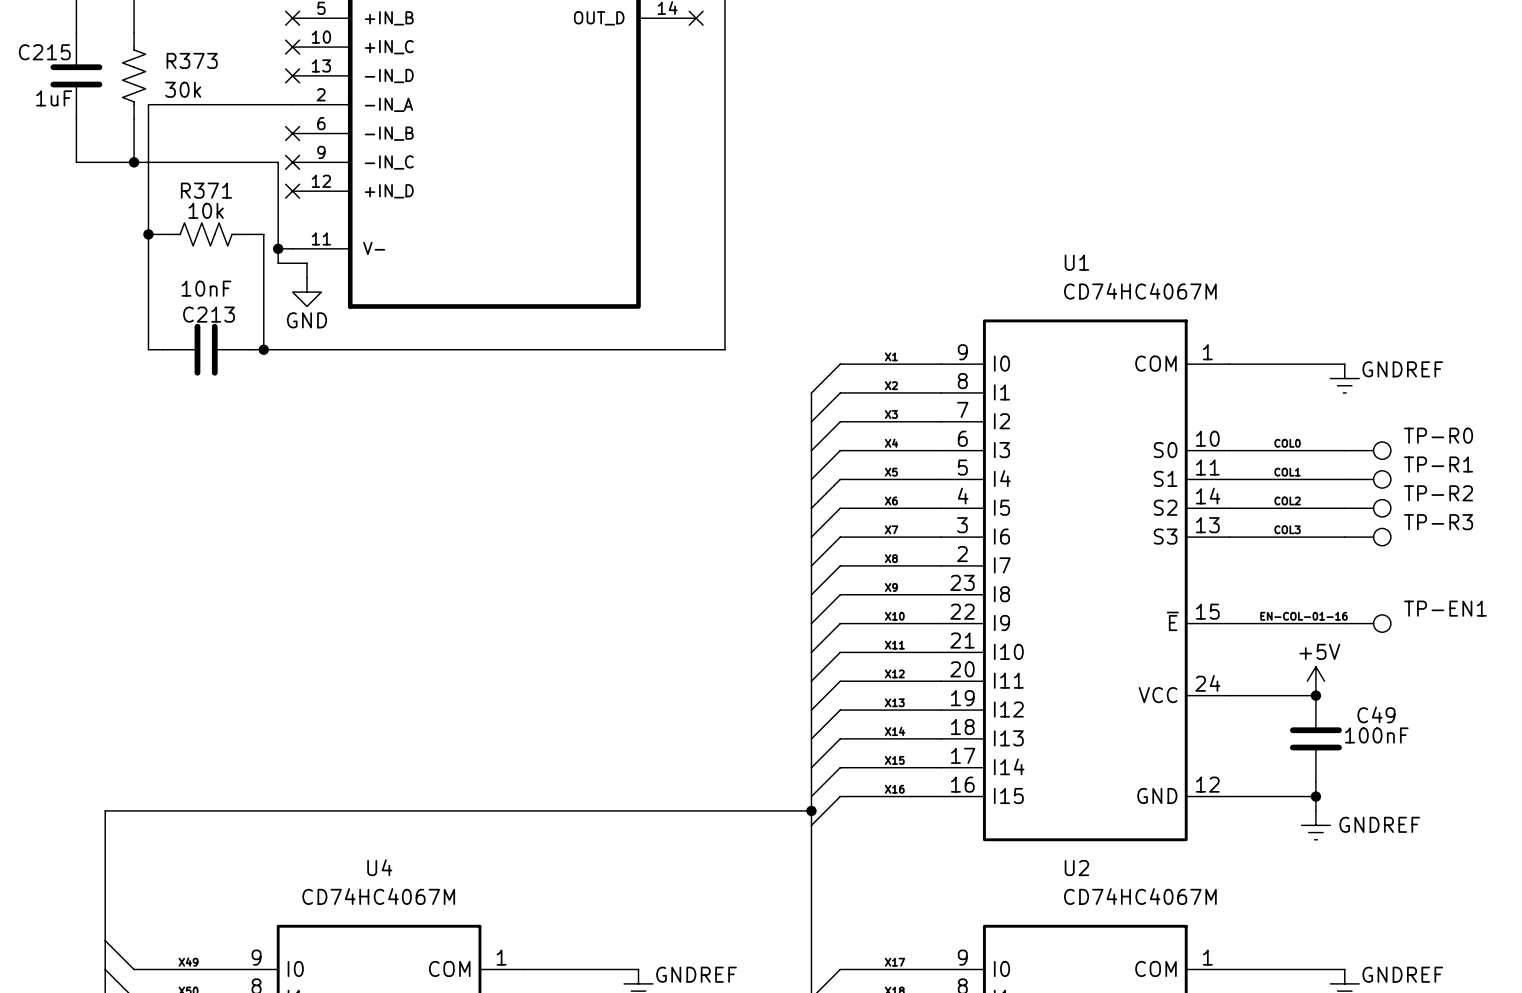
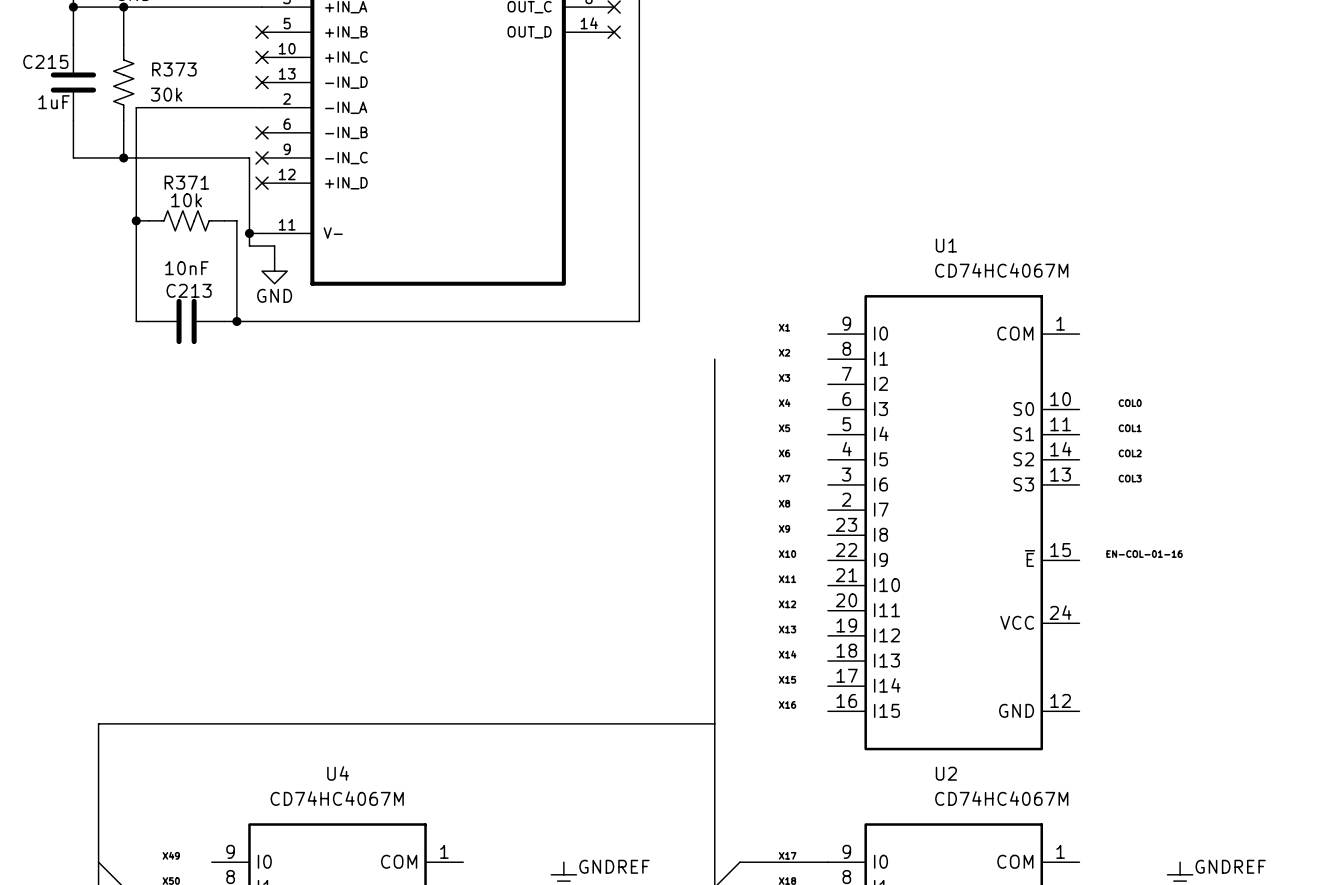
wire: (941, 364) (840, 364) (811, 392) -> none
wire: (1229, 364) (1344, 364) -> none
power symbol: GNDREF (1344, 378) -> none
wire: (941, 392) (840, 392) (811, 421) -> none
wire: (941, 421) (840, 421) (811, 450) -> none
wire: (941, 450) (840, 450) (811, 479) -> none
wire: (1229, 450) (1344, 450) -> none
TP-R0: (1367, 450) -> none
wire: (941, 479) (840, 479) (811, 508) -> none
wire: (1229, 479) (1344, 479) -> none
TP-R1: (1367, 479) -> none
wire: (941, 508) (840, 508) (811, 537) -> none
wire: (1229, 508) (1344, 508) -> none
TP-R2: (1367, 508) -> none
wire: (941, 537) (840, 537) (811, 565) -> none
wire: (1229, 537) (1344, 537) -> none
TP-R3: (1367, 537) -> none
wire: (941, 565) (840, 565) (811, 594) -> none
wire: (941, 594) (840, 594) (811, 623) -> none
wire: (941, 623) (840, 623) (811, 652) -> none
wire: (1229, 623) (1344, 623) -> none
TP-EN1: (1367, 623) -> none
wire: (941, 652) (840, 652) (811, 681) -> none
wire: (941, 681) (840, 681) (811, 710) -> none
power symbol: +5V (1315, 681) -> none
wire: (1229, 695) (1315, 695) -> none
junction: (1315, 695) -> none
wire: (941, 710) (840, 710) (811, 738) -> none
wire: (941, 738) (840, 738) (811, 767) -> none
C49: 100nF (1315, 738) -> none
wire: (941, 767) (840, 767) (811, 796) -> none
wire: (1315, 782) (1315, 810) -> none
wire: (941, 796) (840, 796) (811, 825) -> none
wire: (1229, 796) (1315, 796) -> none
junction: (1315, 796) -> none
junction: (811, 810) -> none
power symbol: GNDREF (1315, 825) -> none
wire: (105, 940) (134, 969) (234, 969) -> none
wire: (523, 969) (638, 969) -> none
wire: (1229, 969) (1344, 969) -> none

